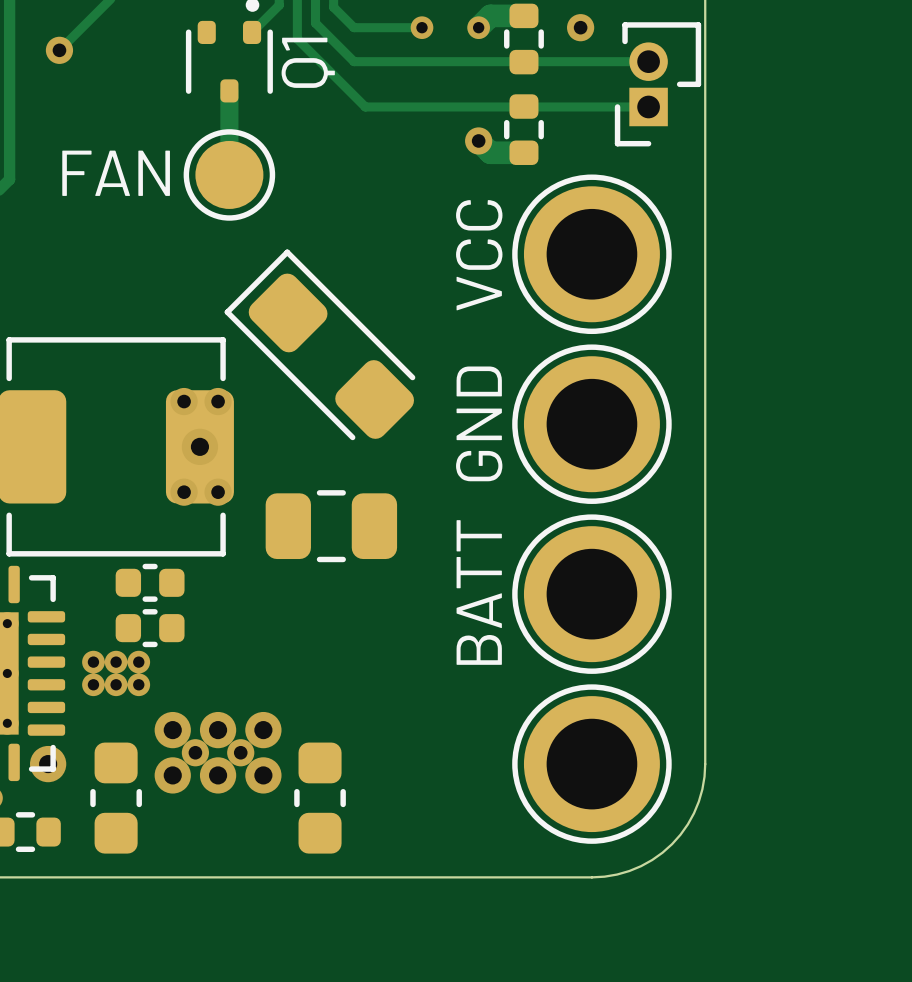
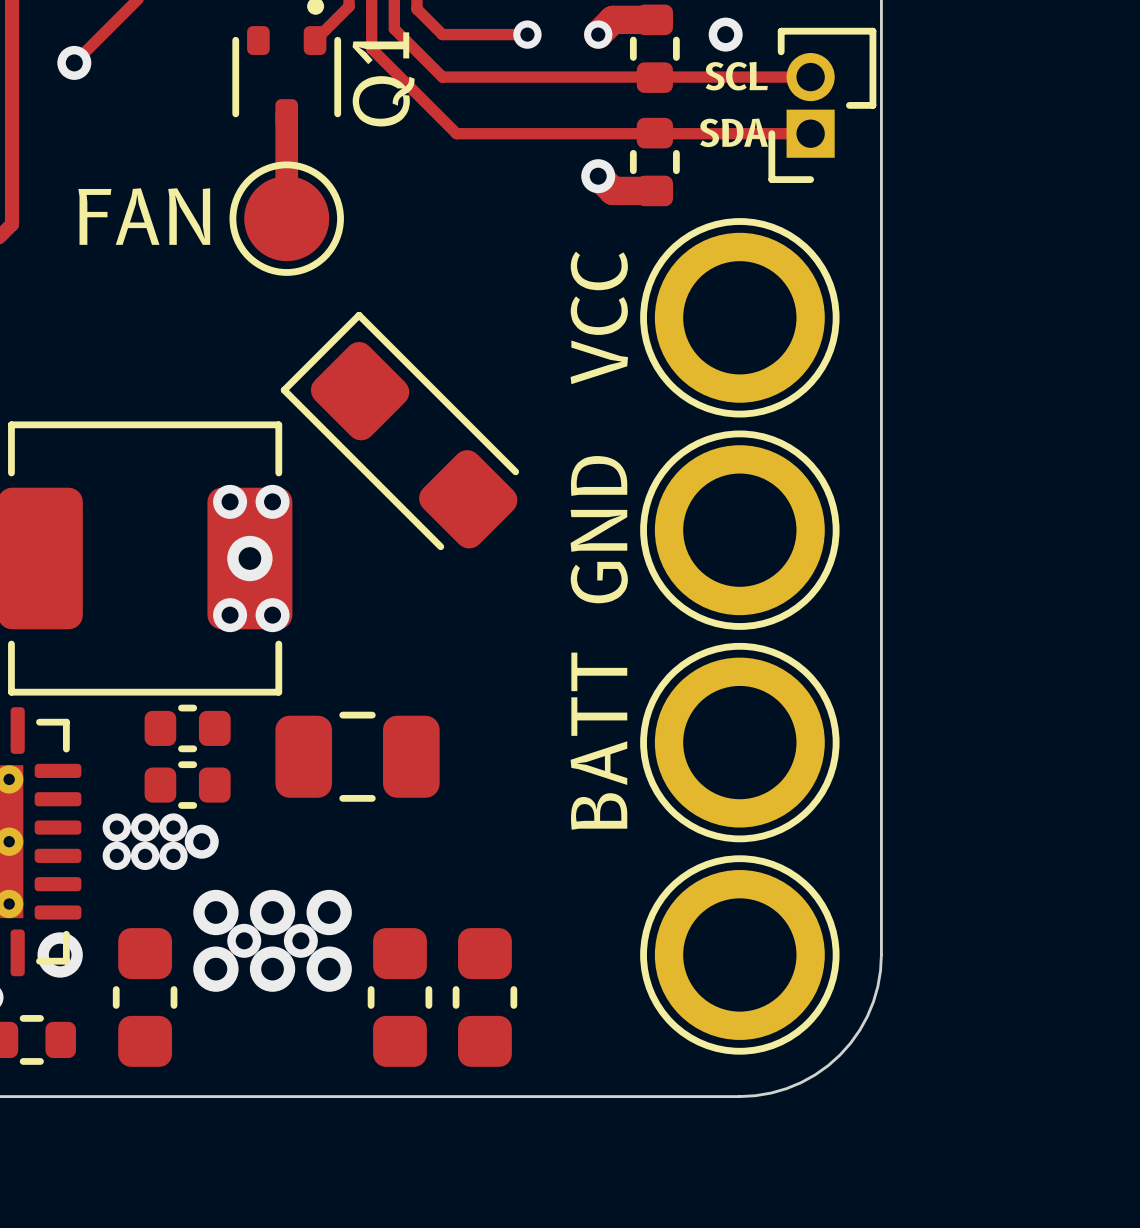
text: none -> SCL (736, 76)
text: none -> SDA (734, 132)
part position: (331, 526) -> (357, 756)
via: none -> (201, 841)
part: none -> (484, 997)

